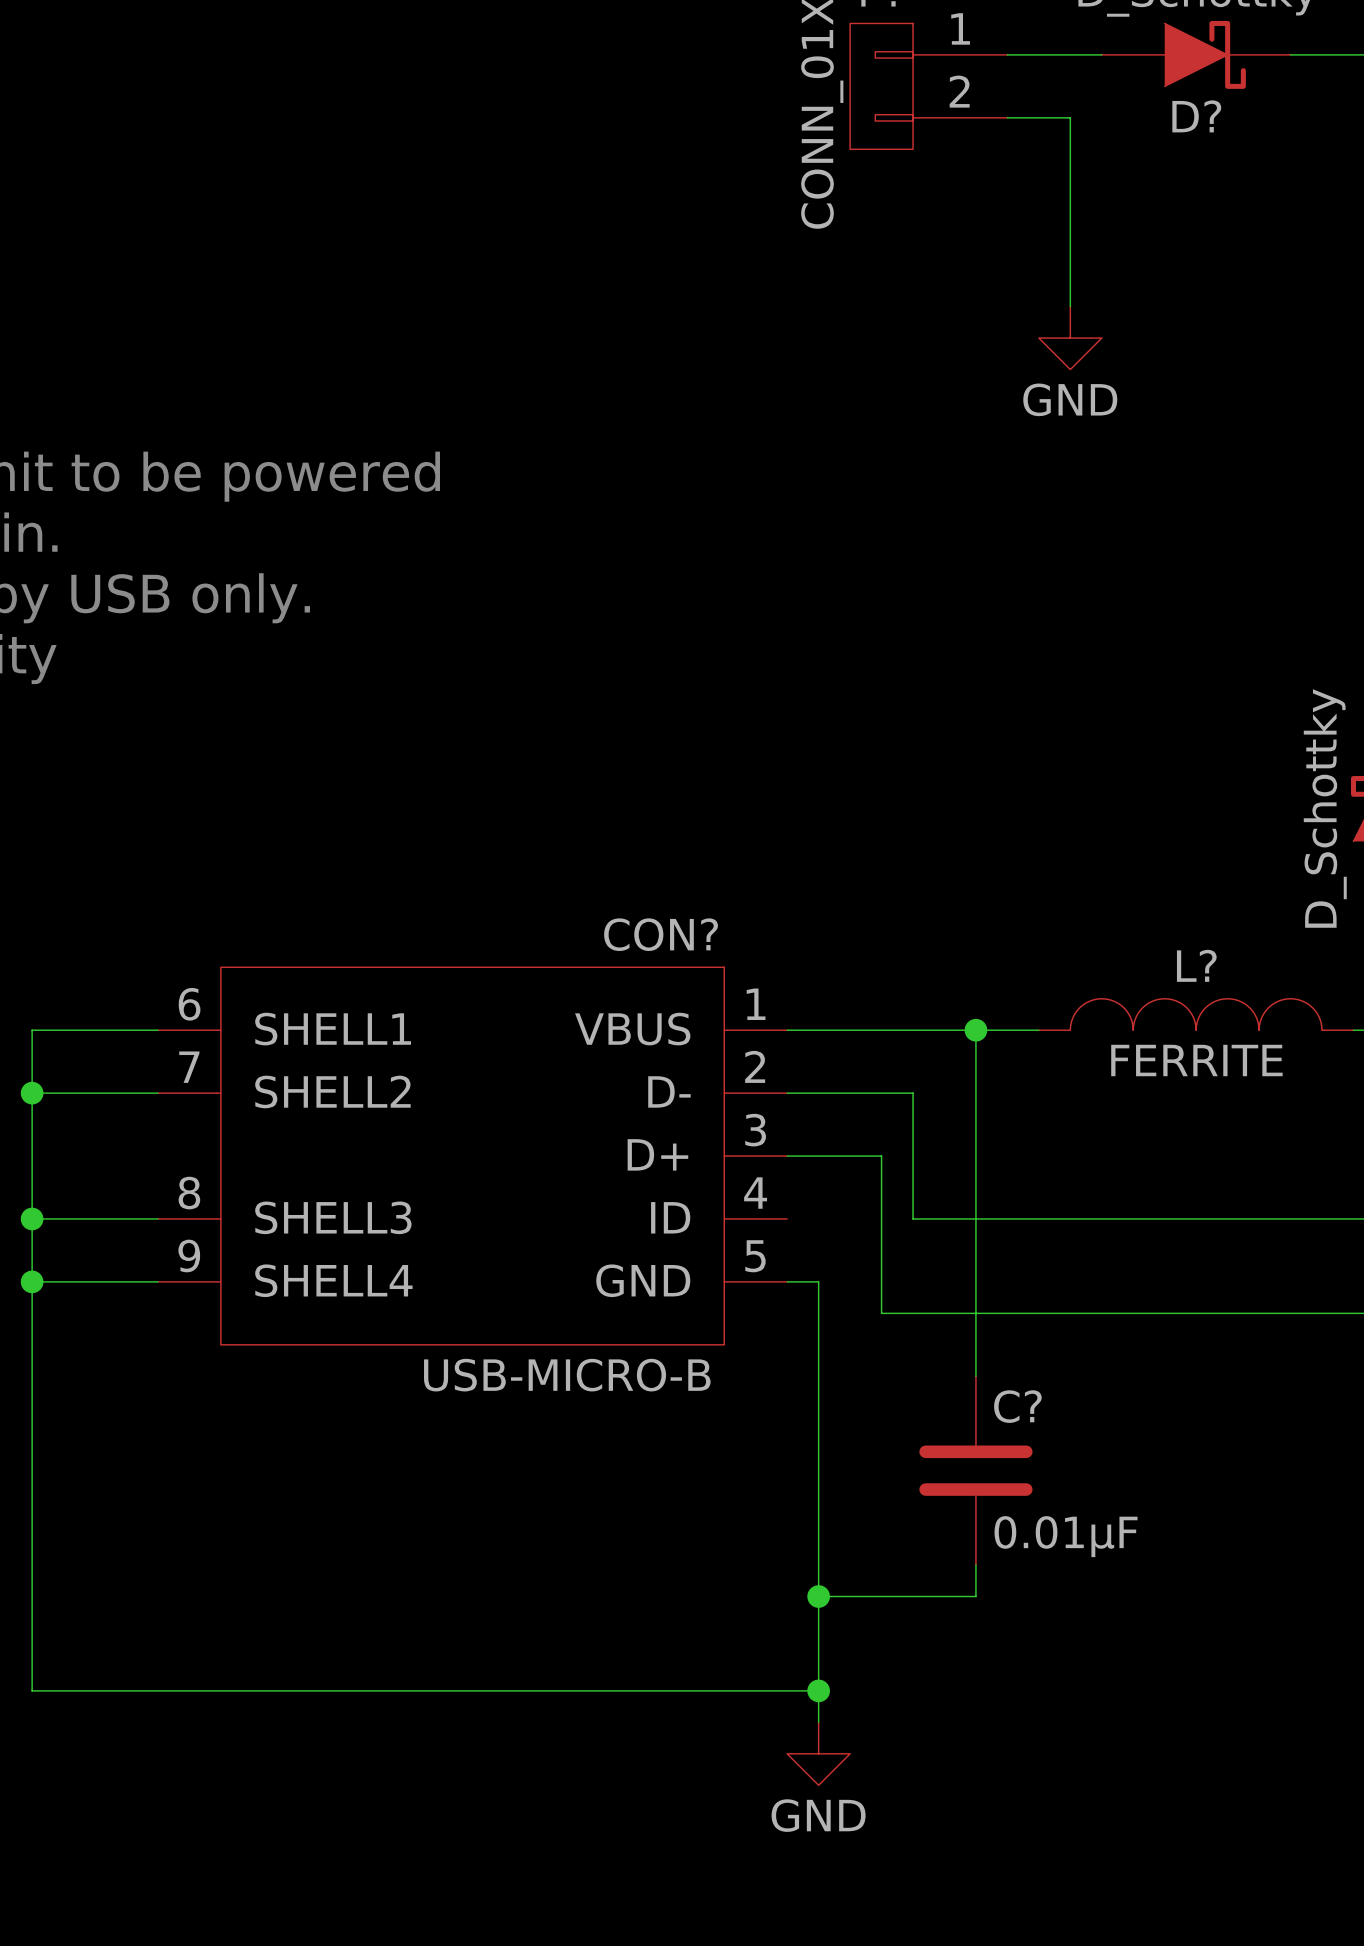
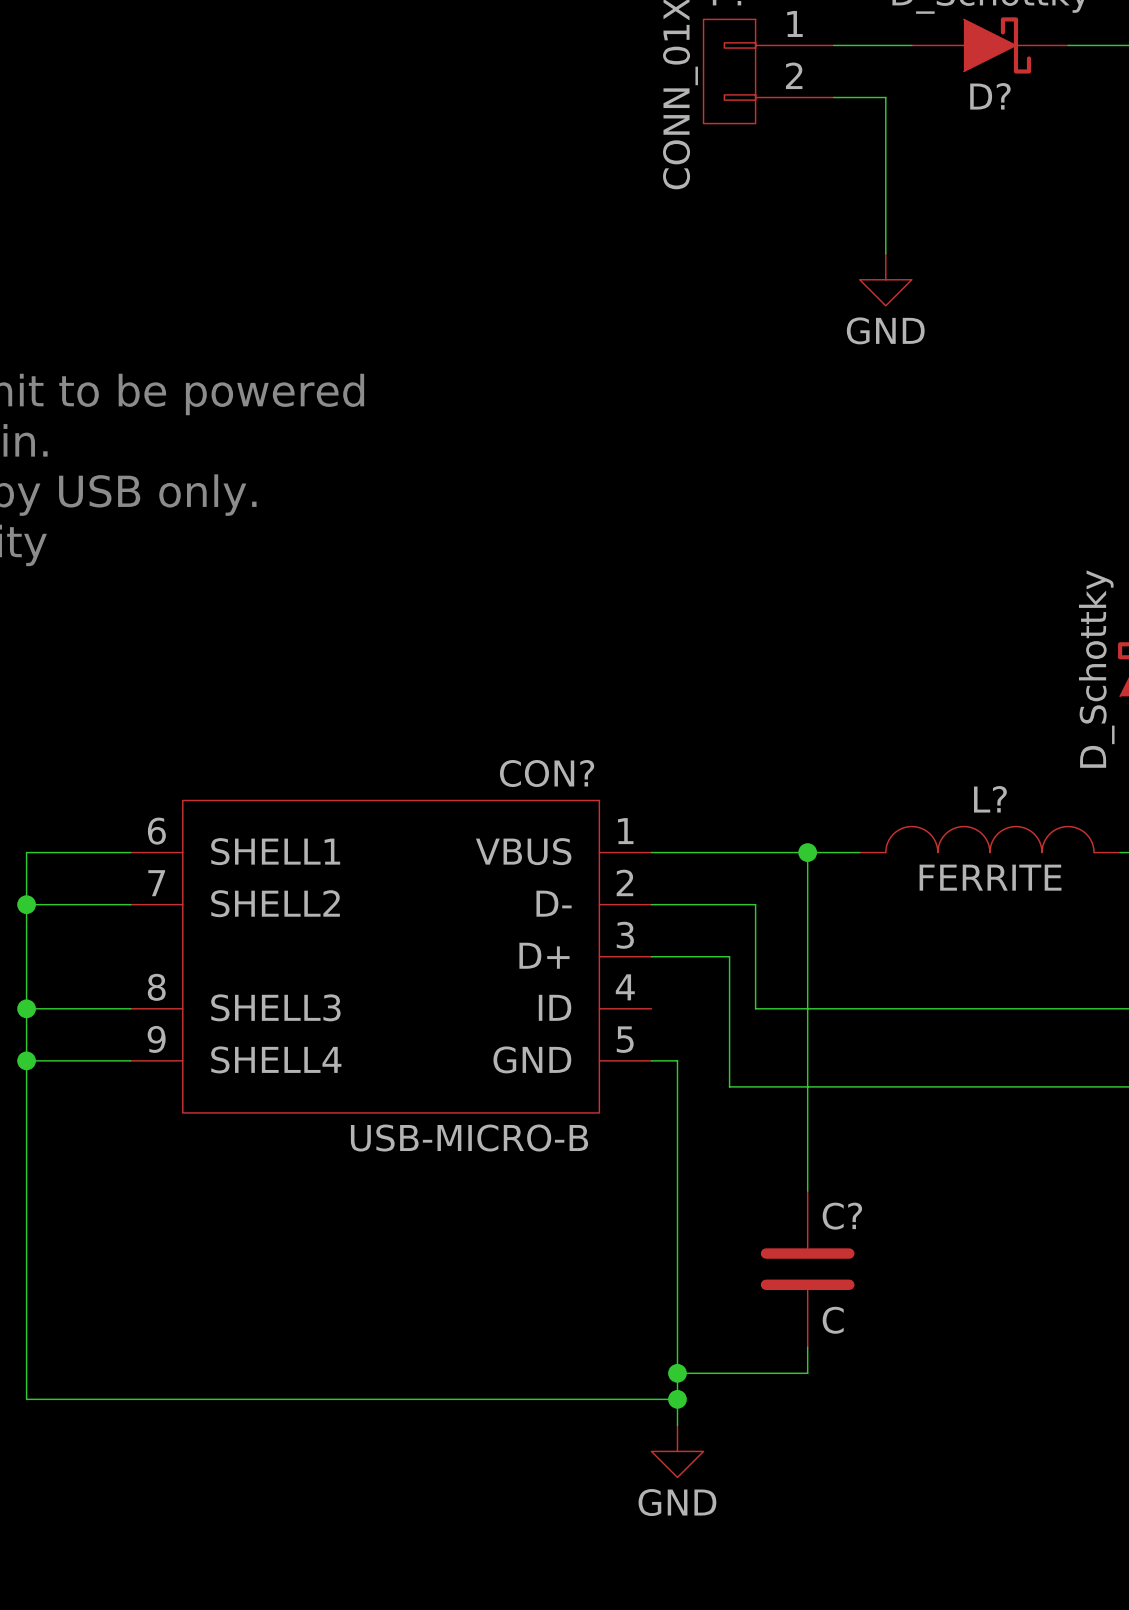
C?: 0.01μF (975, 1470) -> none
C?: none -> C (807, 1269)
wire: (975, 1565) (975, 1596) (818, 1596) -> (807, 1347) (807, 1373) (677, 1373)
junction position: (818, 1596) -> (677, 1373)

